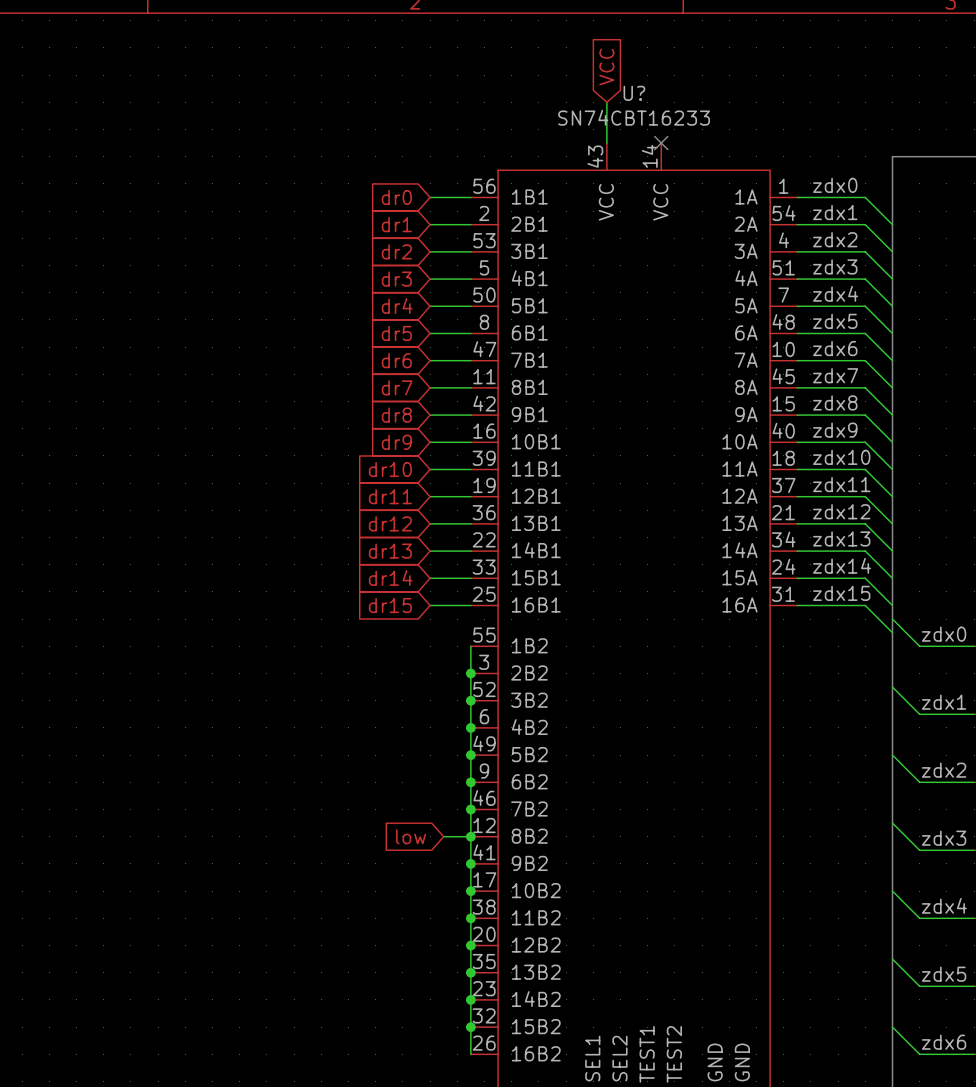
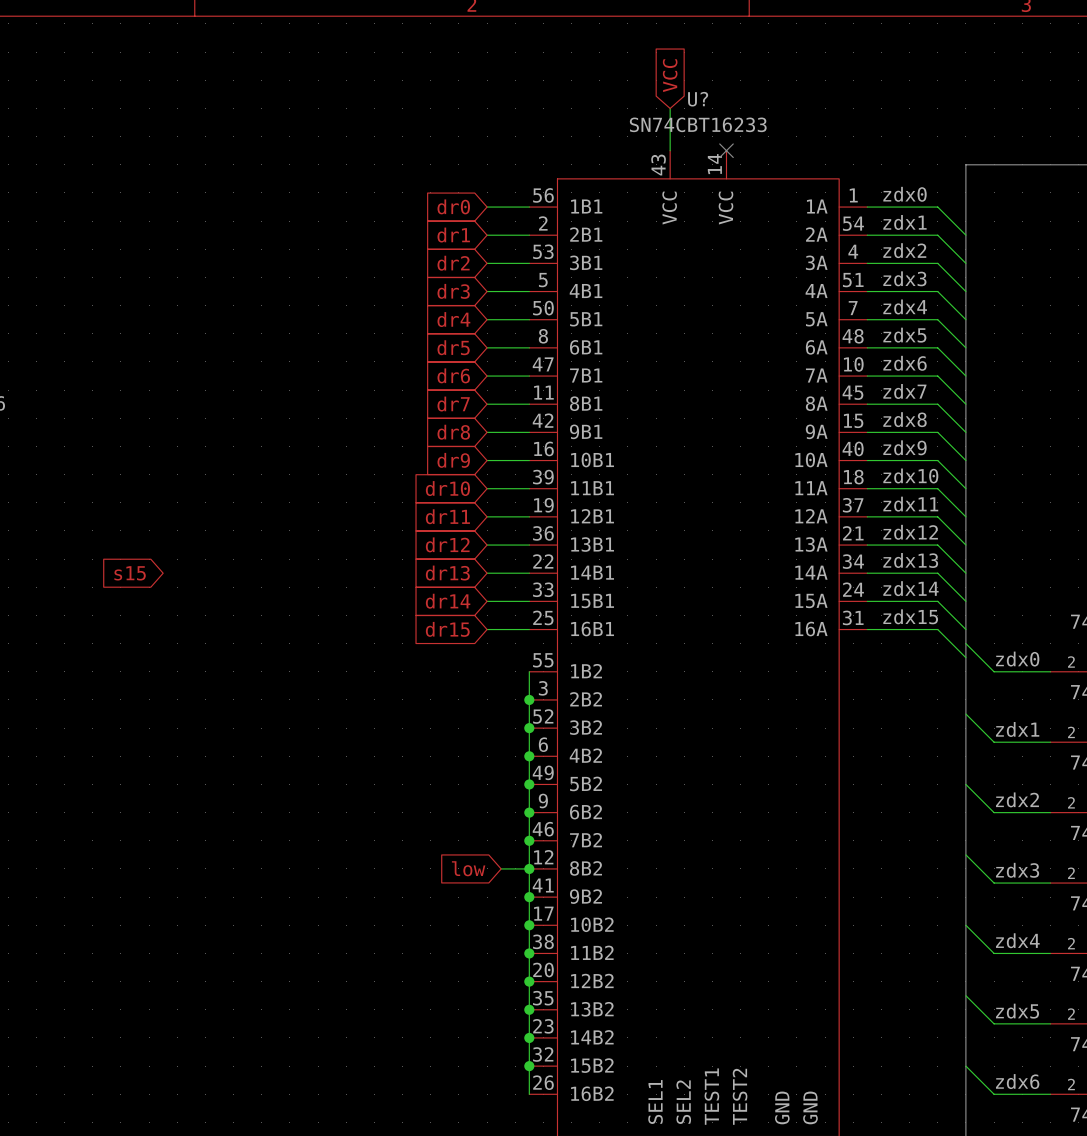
global label: none -> s15 (130, 573)

